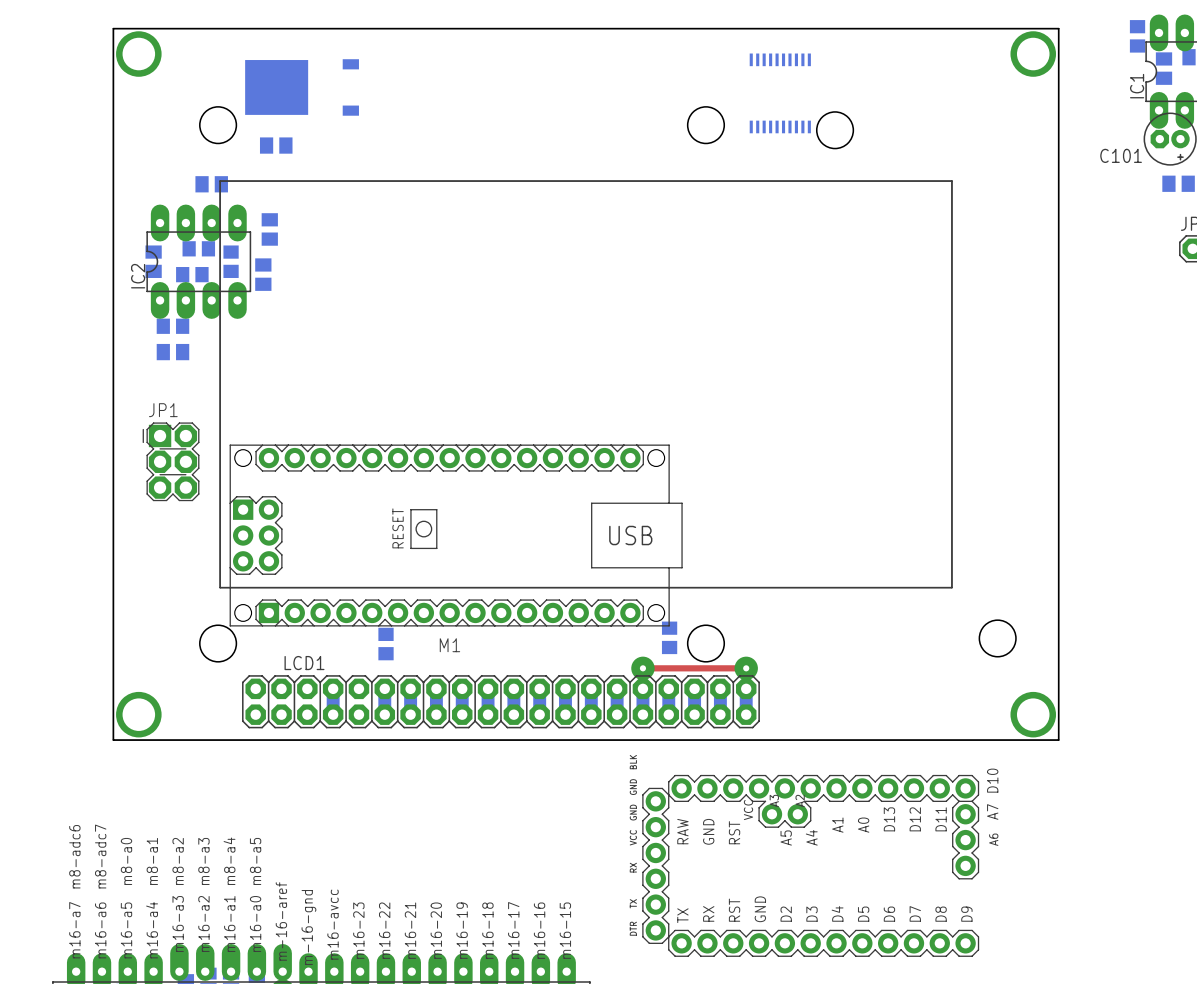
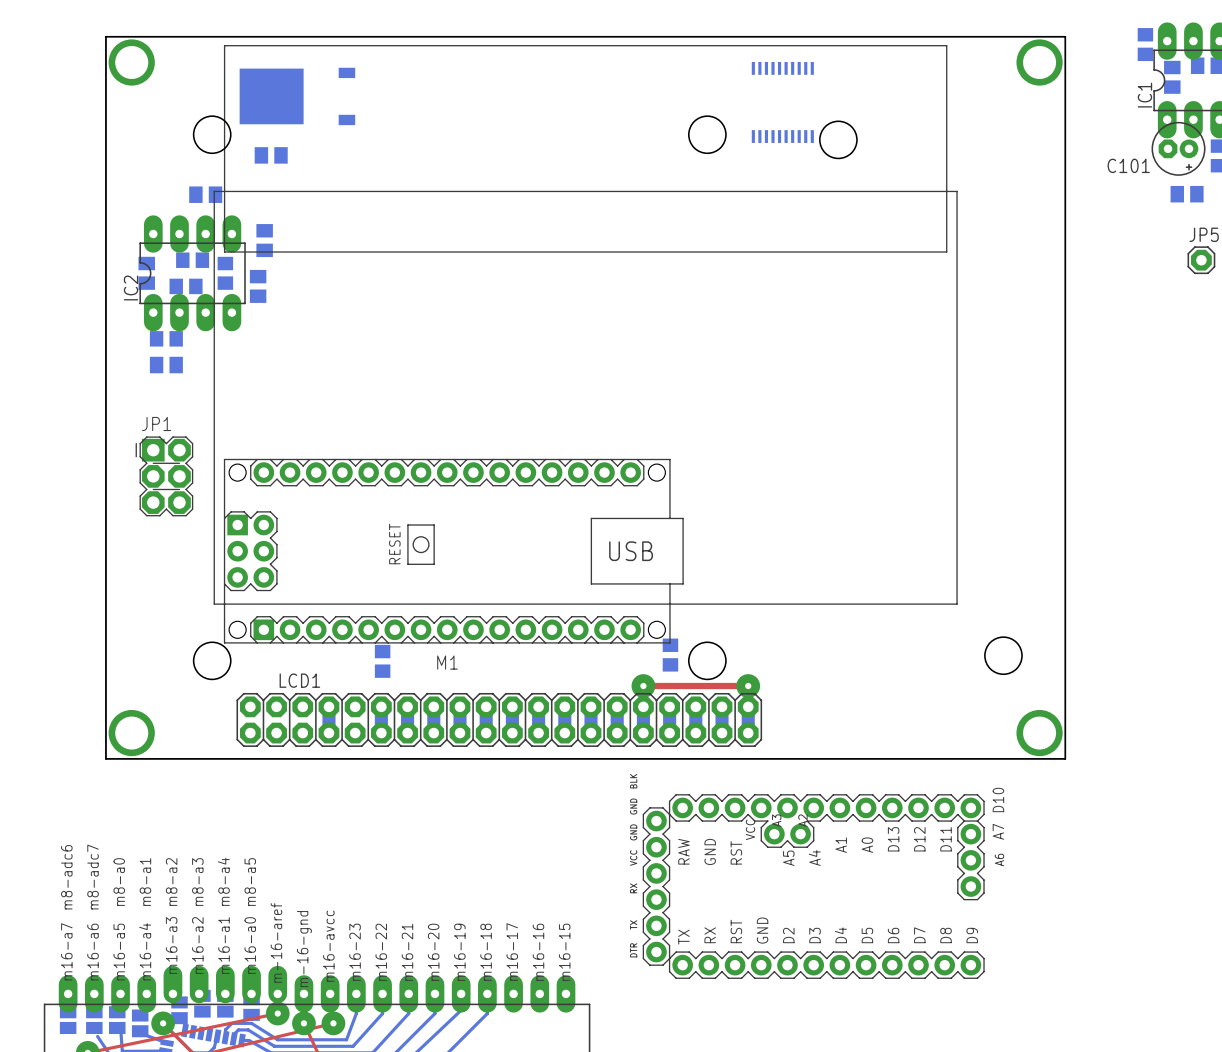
drawing: none -> [223, 45, 948, 253]
line: (220, 181) (951, 181) (951, 587) (220, 587) (220, 181) -> none

